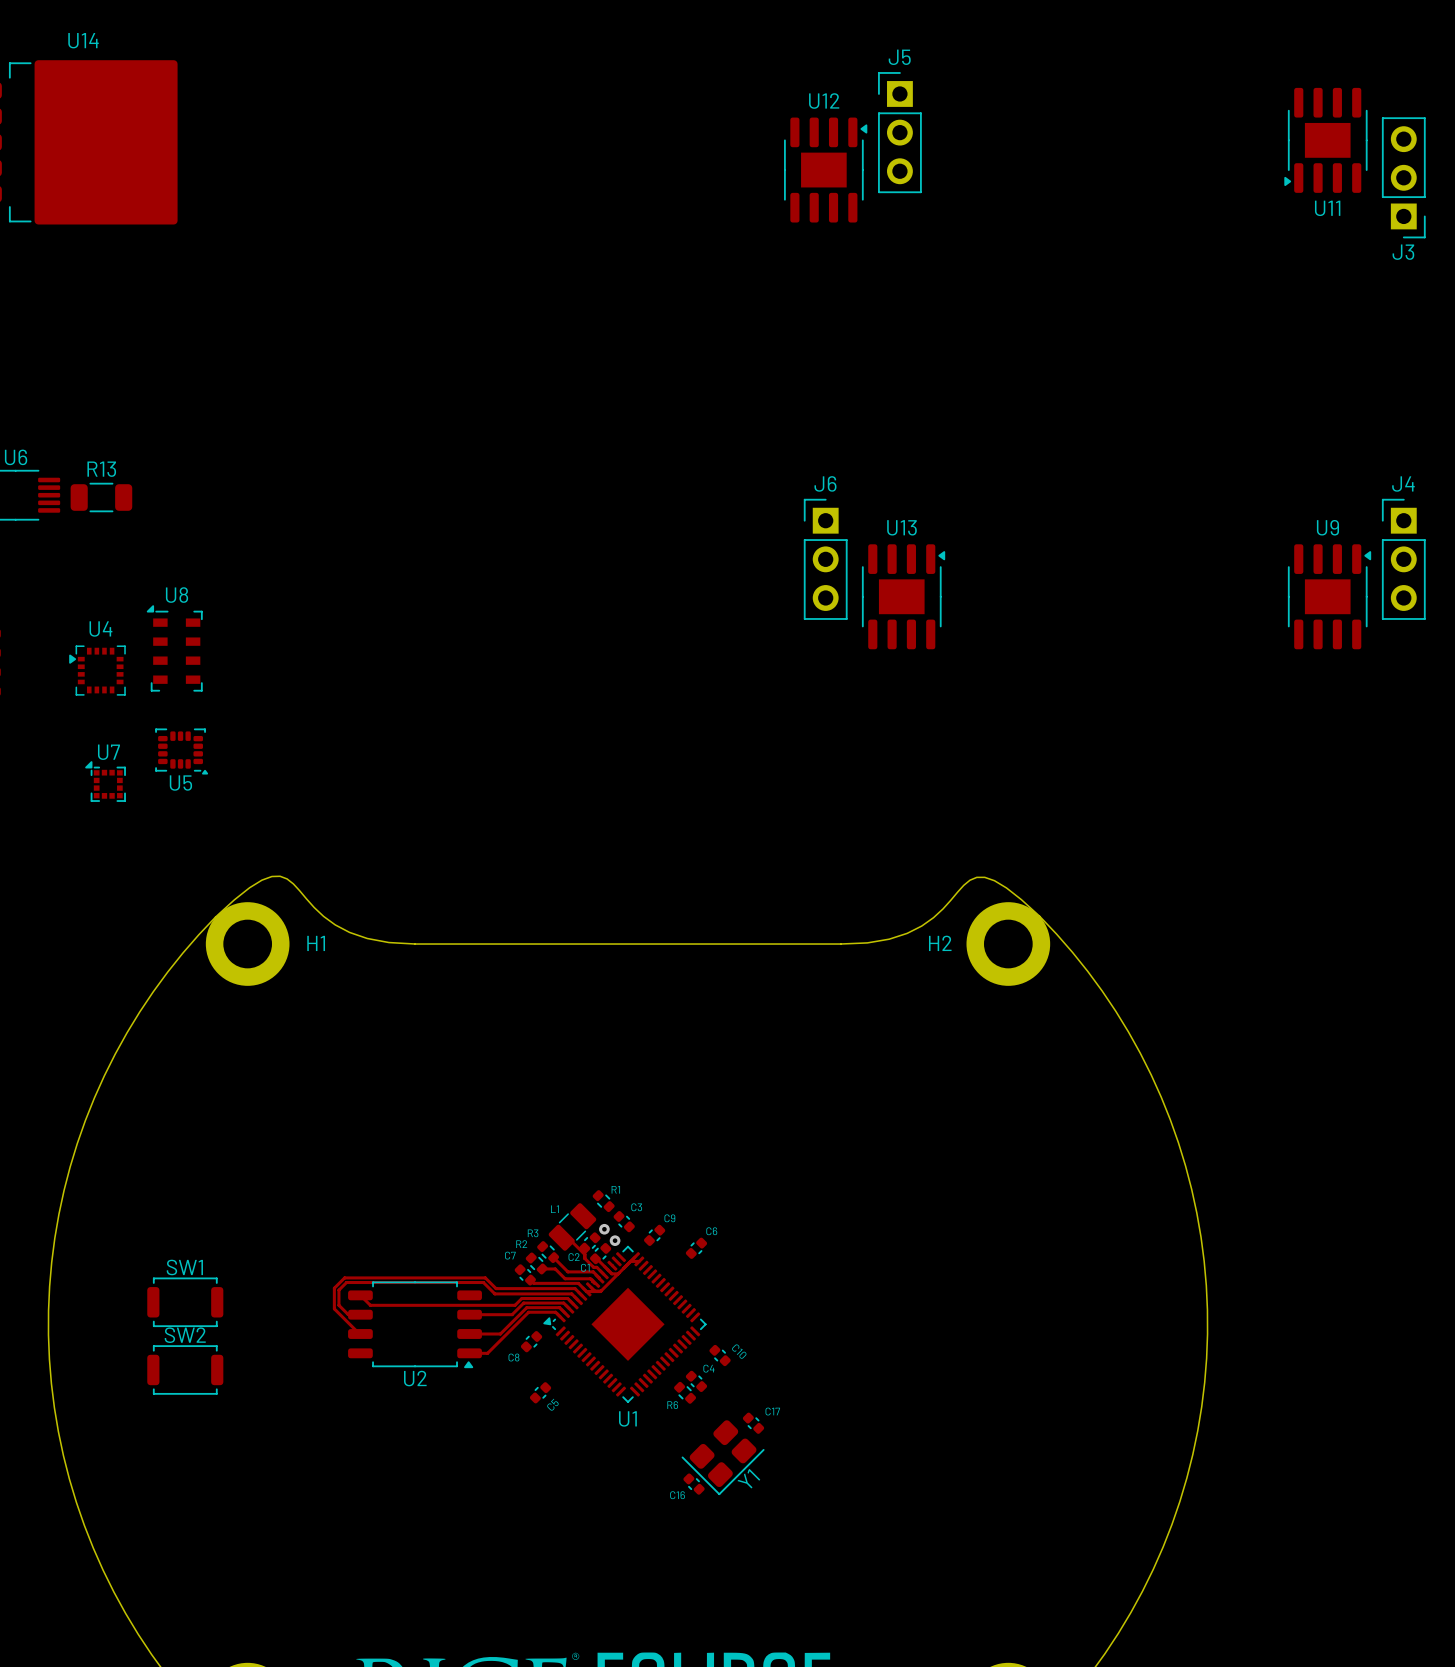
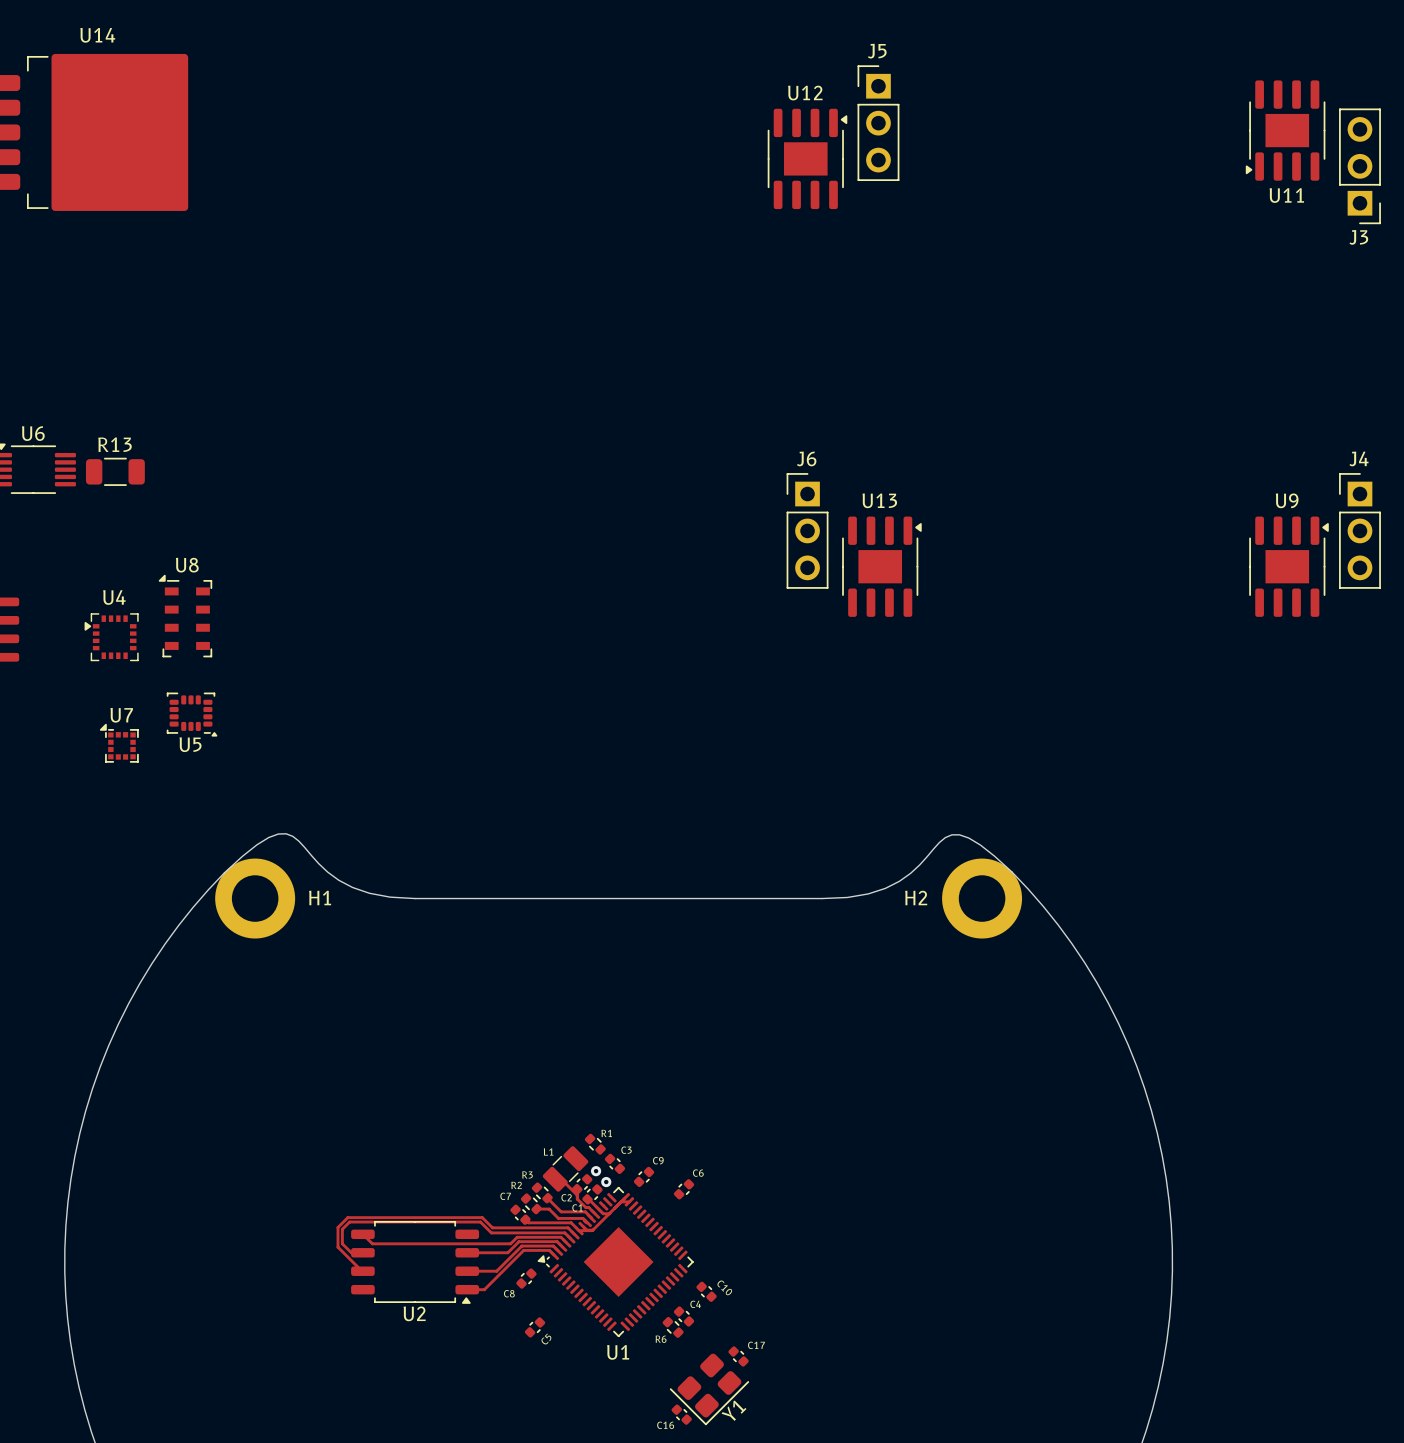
SW1: (185, 1302) -> none
SW2: (185, 1369) -> none

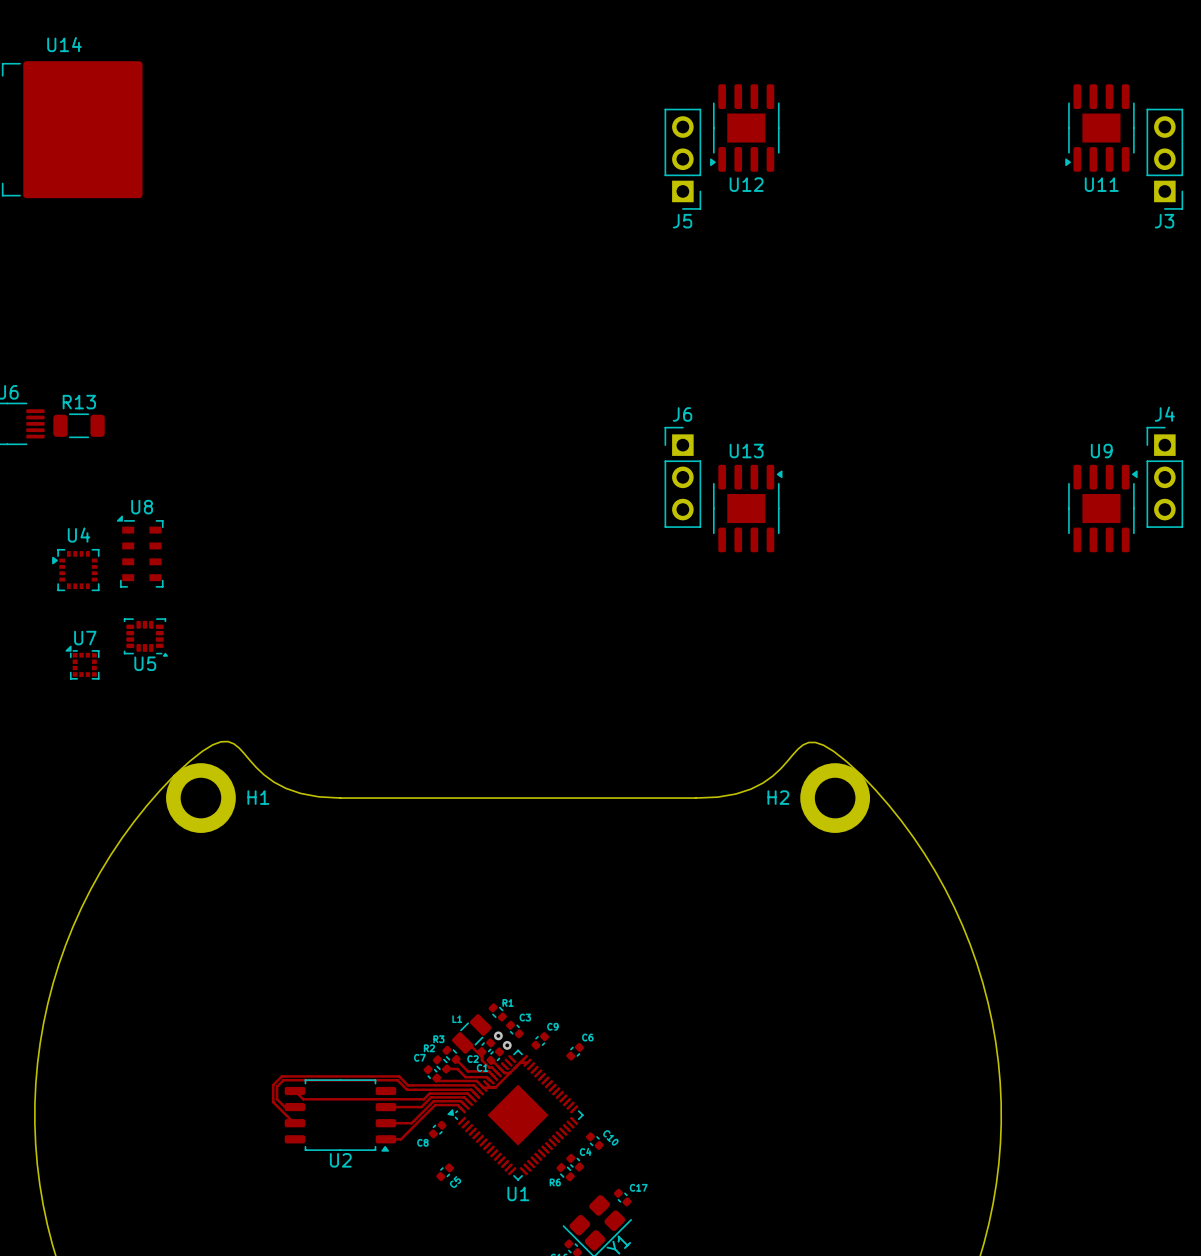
J5 rotation: 0° (878, 123) -> 180° (682, 159)
J5 position: (878, 123) -> (682, 159)
U12 rotation: 0° (807, 158) -> 180° (744, 128)
U12 position: (807, 158) -> (744, 128)

